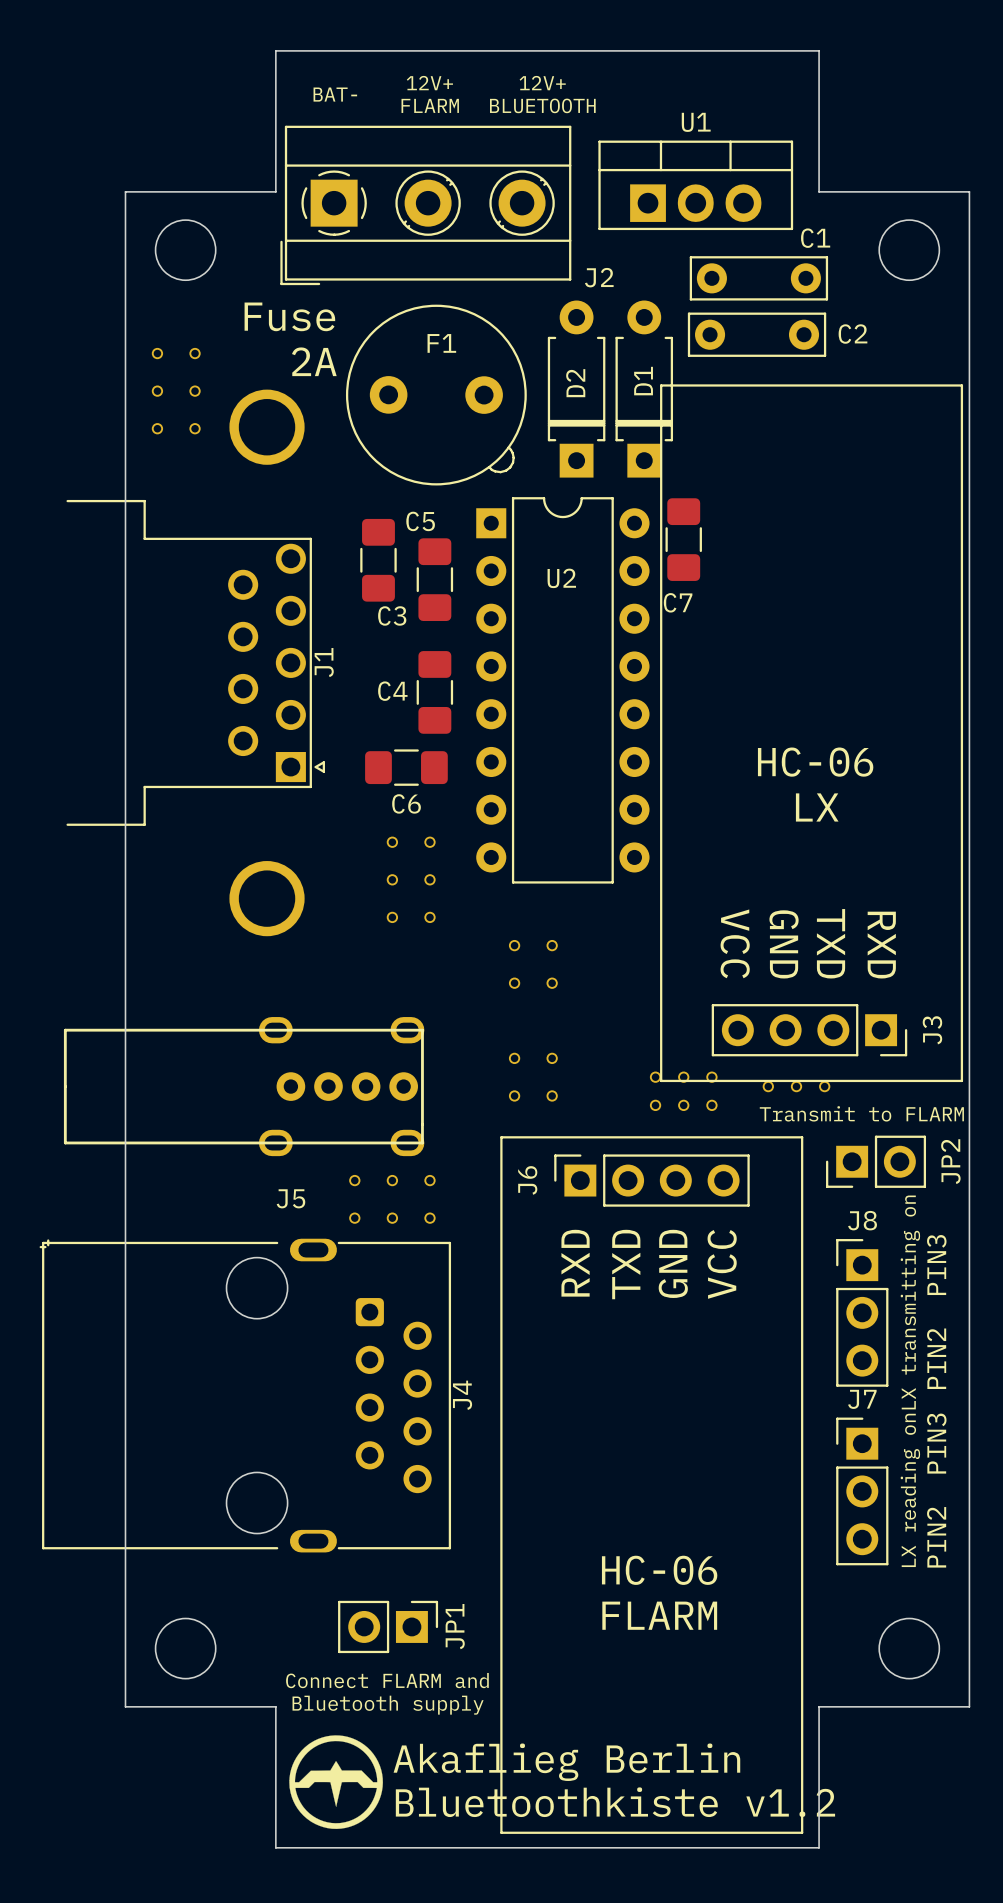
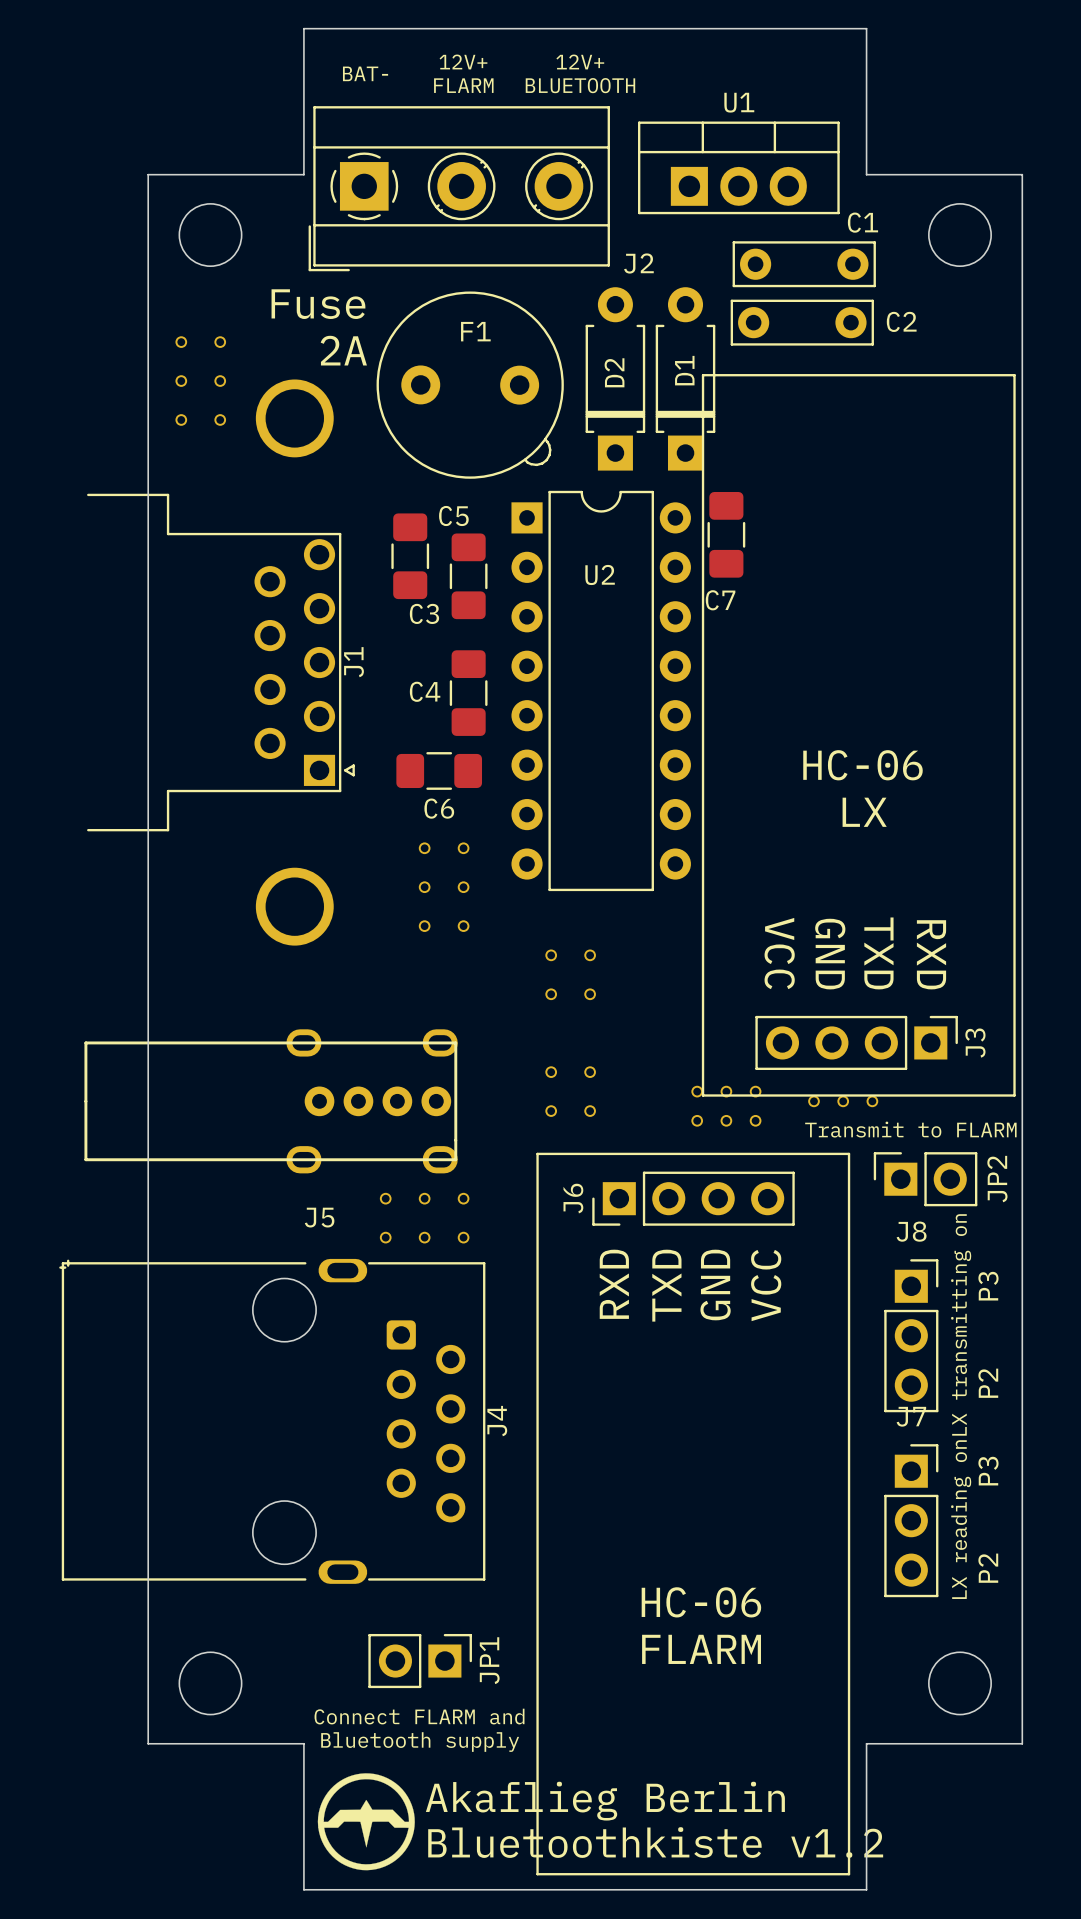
J3 footprint: [711, 1004, 908, 1057] -> [755, 1015, 958, 1071]
JP2 footprint: [826, 1135, 927, 1188] -> [873, 1152, 978, 1207]
J6 footprint: [554, 1154, 750, 1207] -> [592, 1171, 795, 1226]
J8 footprint: [836, 1239, 889, 1387] -> [884, 1259, 939, 1413]
text: PIN3 (936, 1265) -> P3 (988, 1286)
text: PIN2 (936, 1358) -> P2 (988, 1383)
J7 footprint: [836, 1417, 889, 1566] -> [884, 1444, 939, 1598]
text: PIN3 (936, 1443) -> P3 (988, 1471)
text: PIN2 (936, 1537) -> P2 (988, 1568)

